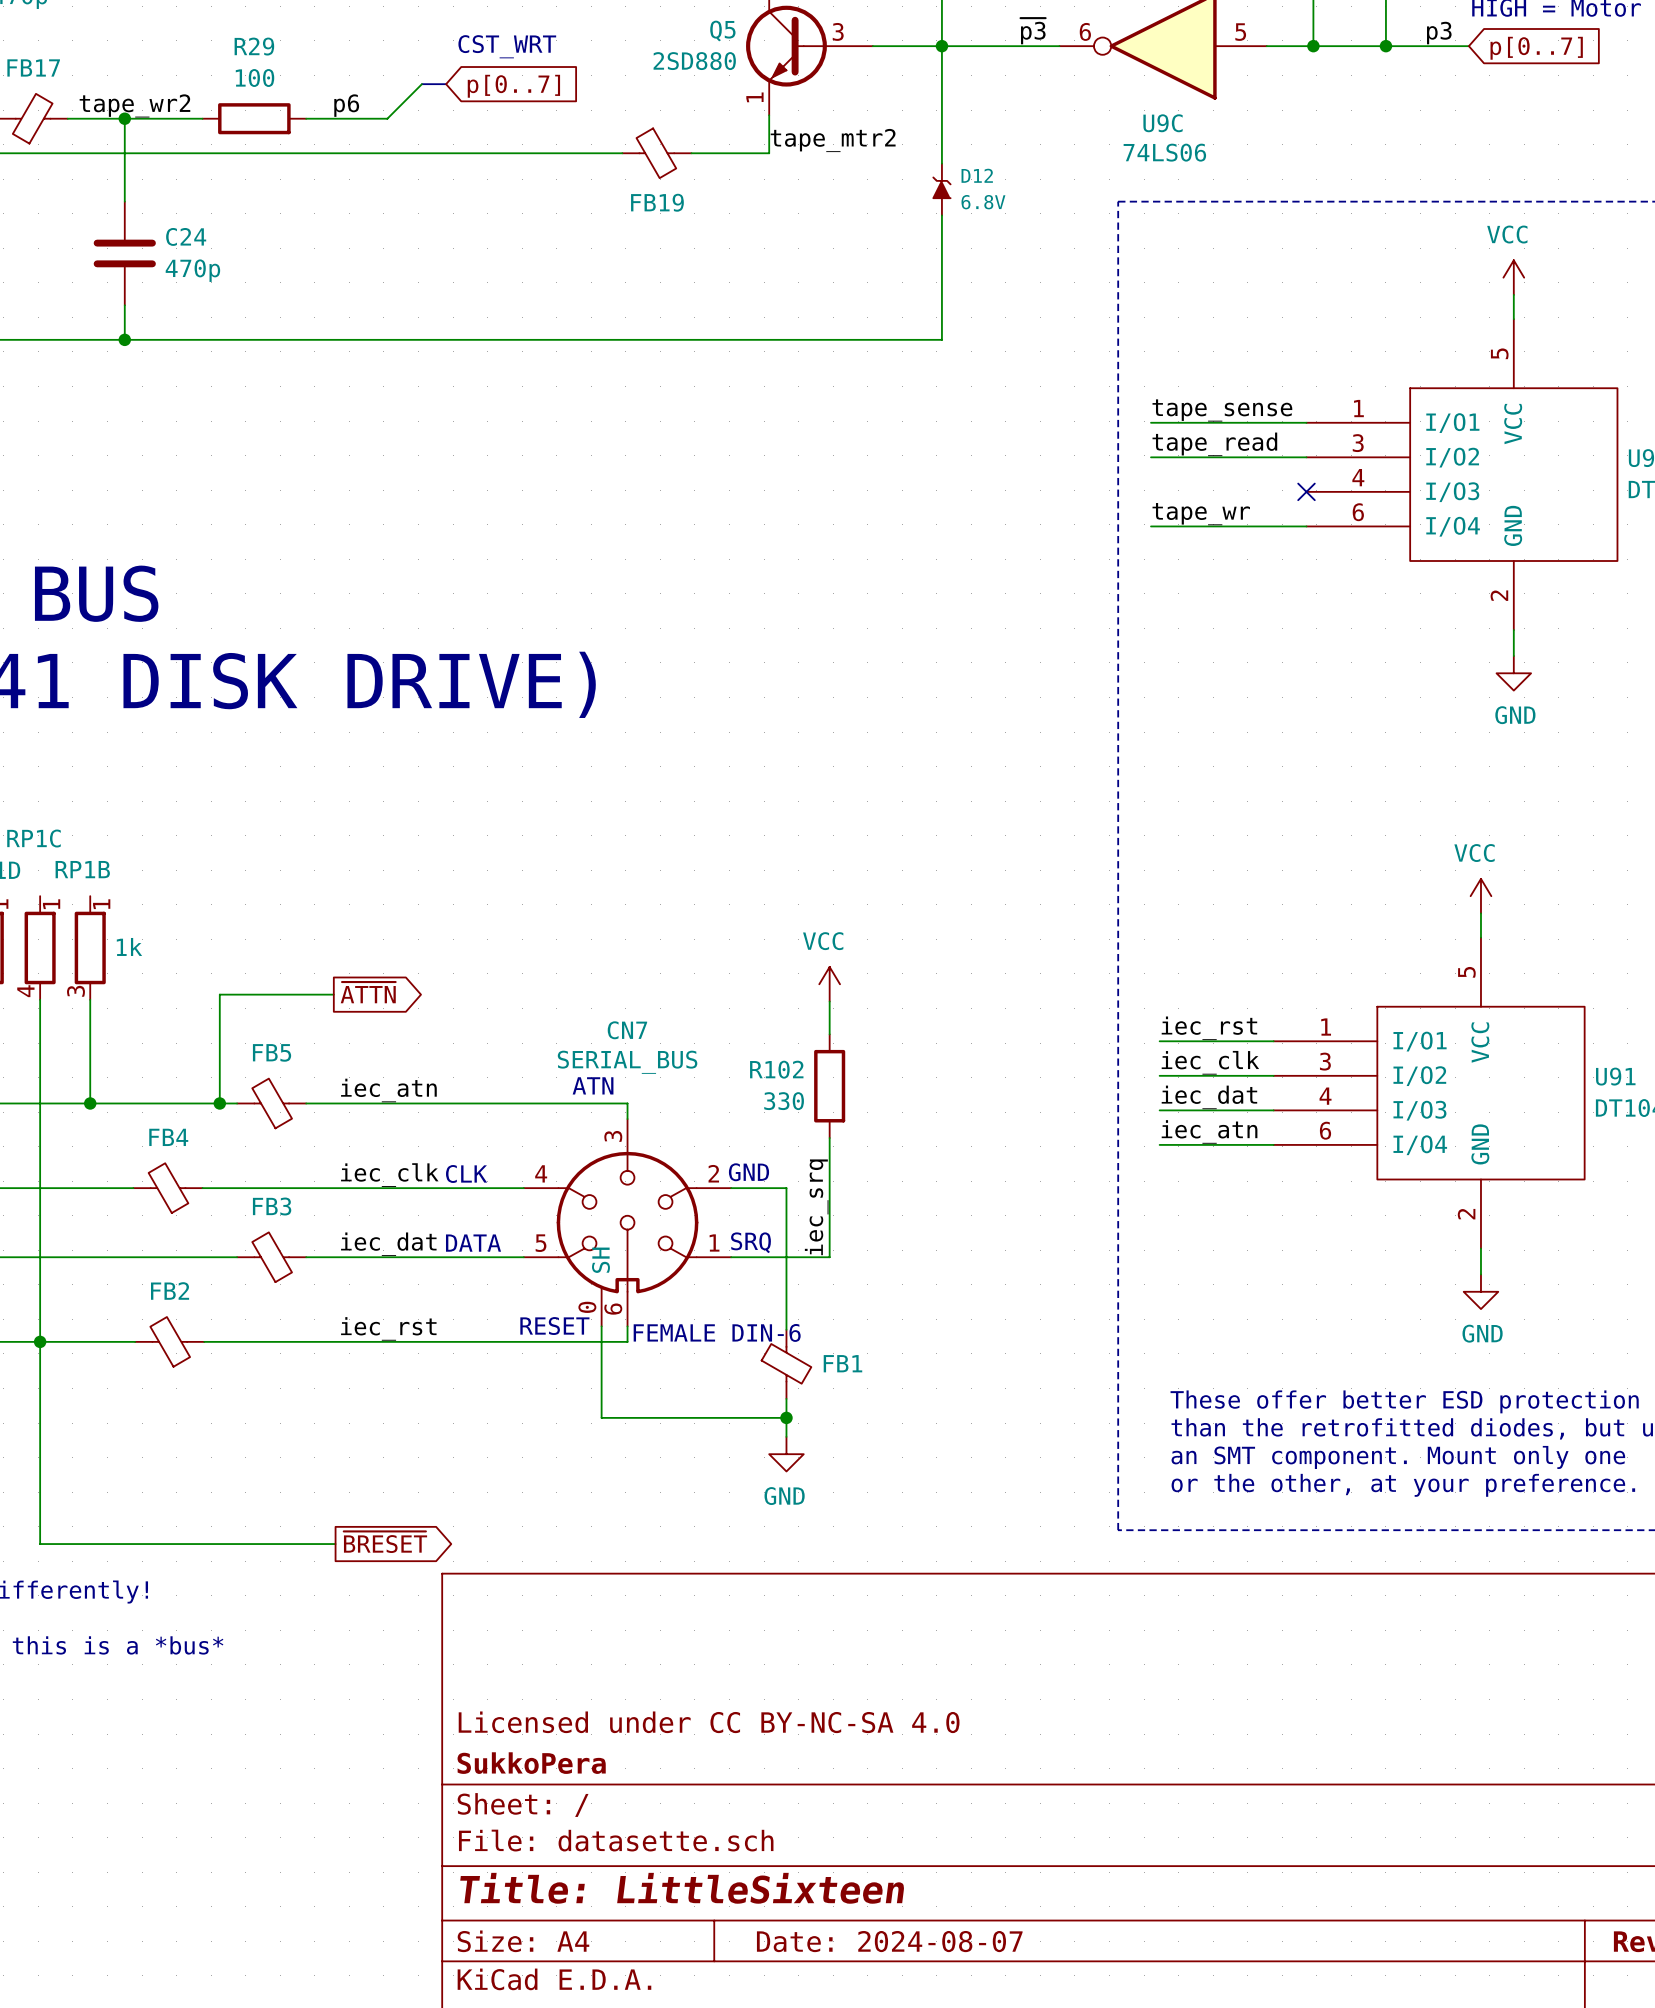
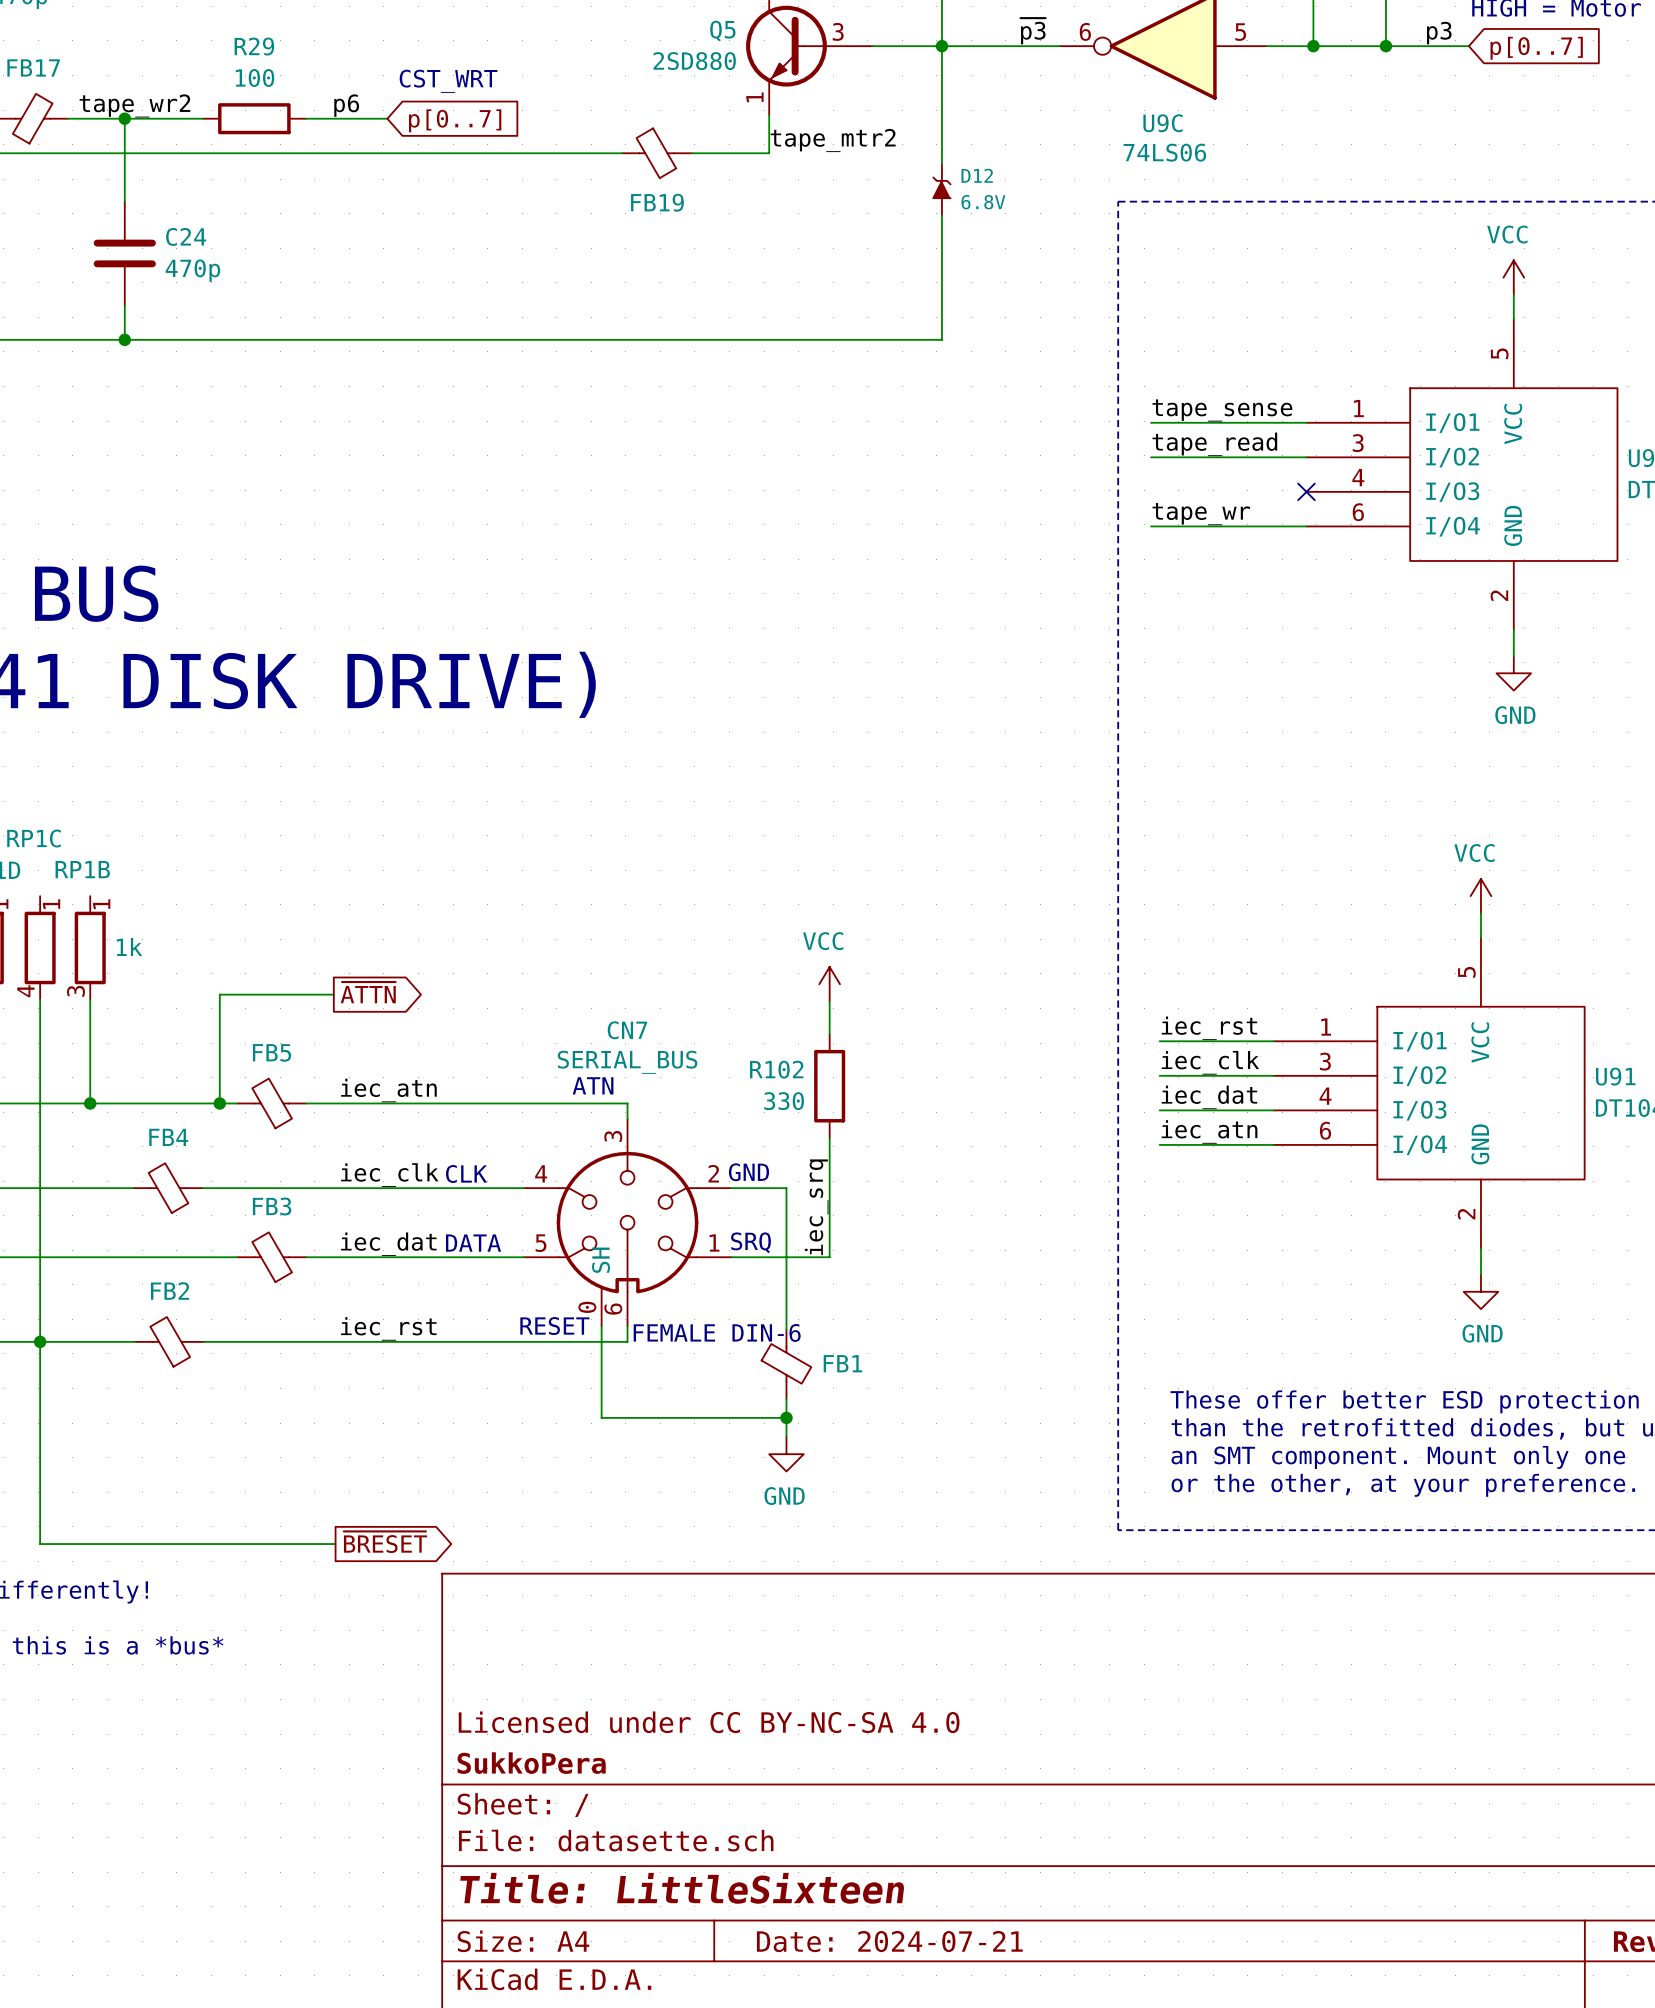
text position: CST_WRT (507, 46) -> CST_WRT (448, 81)
wire: (421, 84) (387, 118) -> none
bus: (421, 84) (446, 84) -> none
global label position: p[0..7] (513, 86) -> p[0..7] (455, 120)
title block: Date: 2024-08-07 (889, 1941) -> Date: 2024-07-21 (889, 1941)

